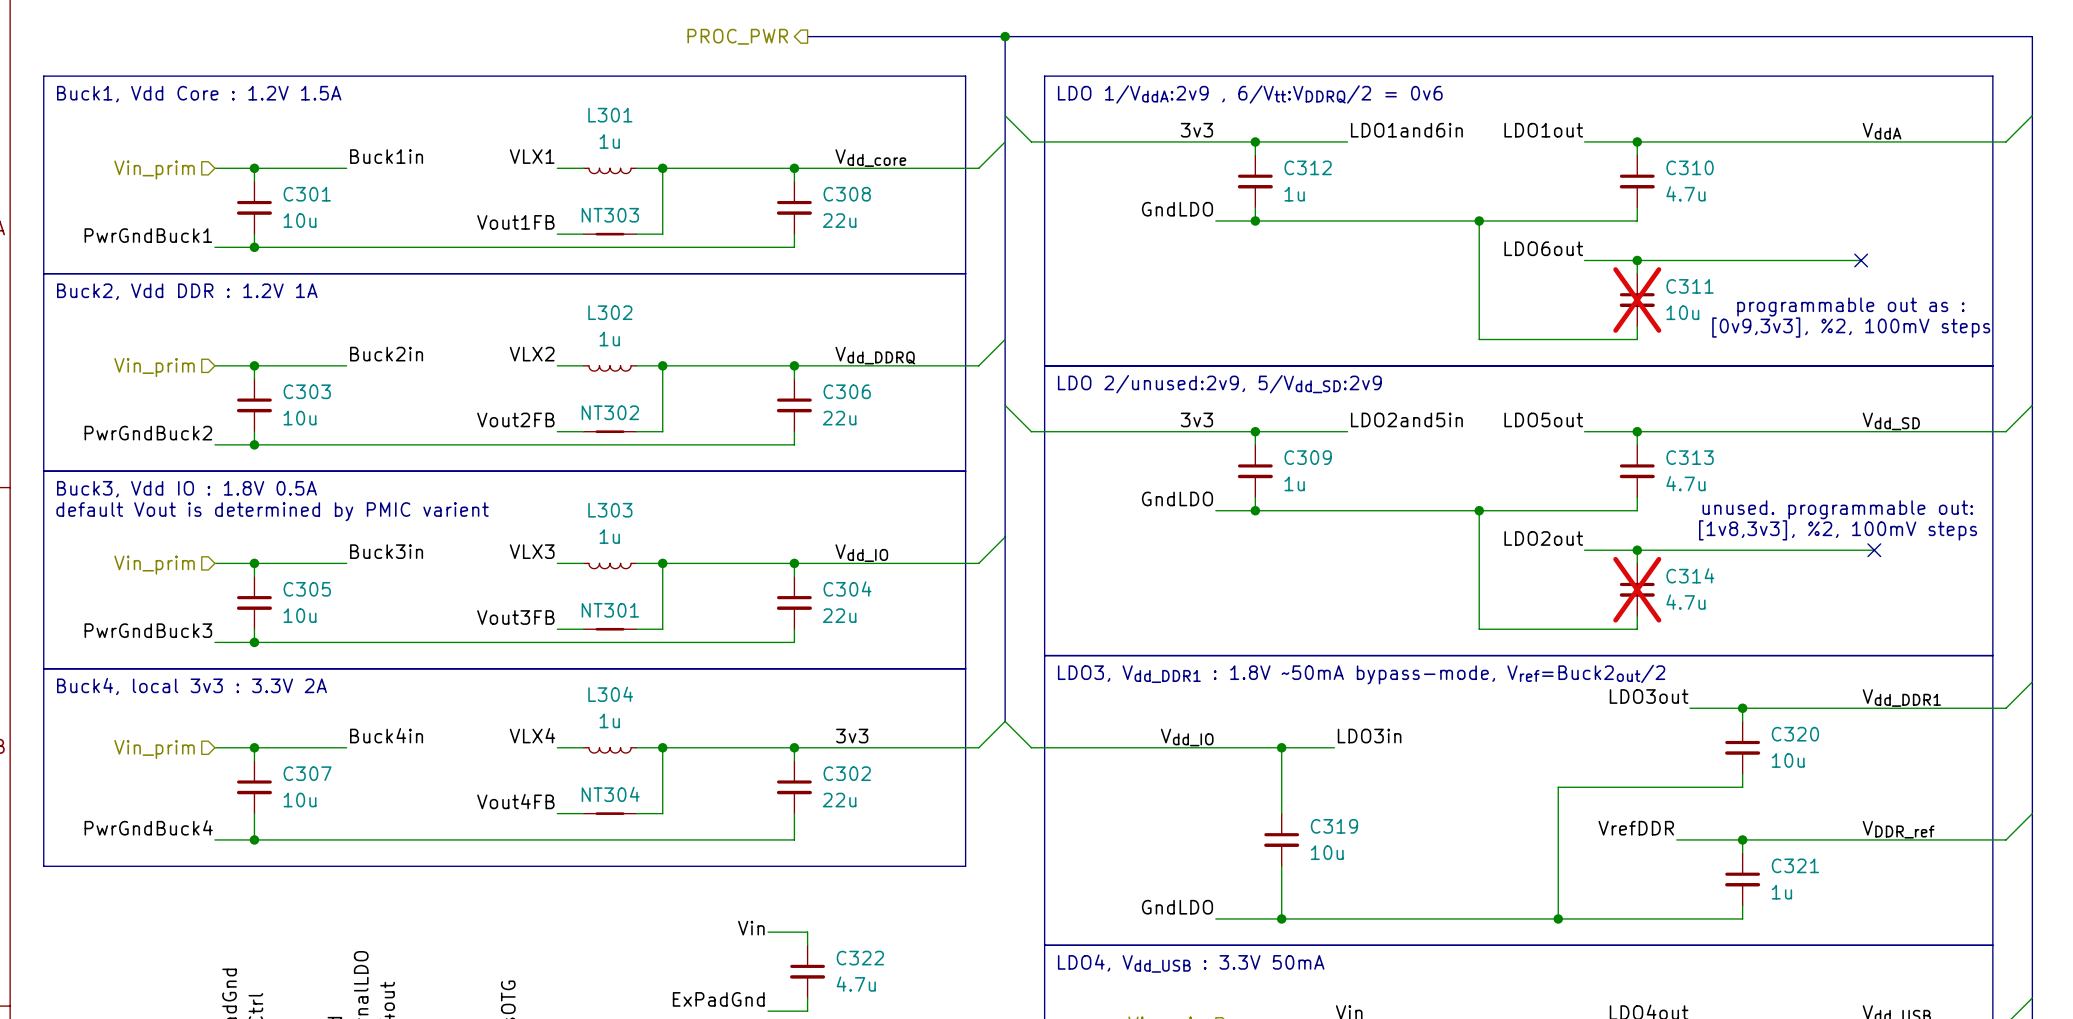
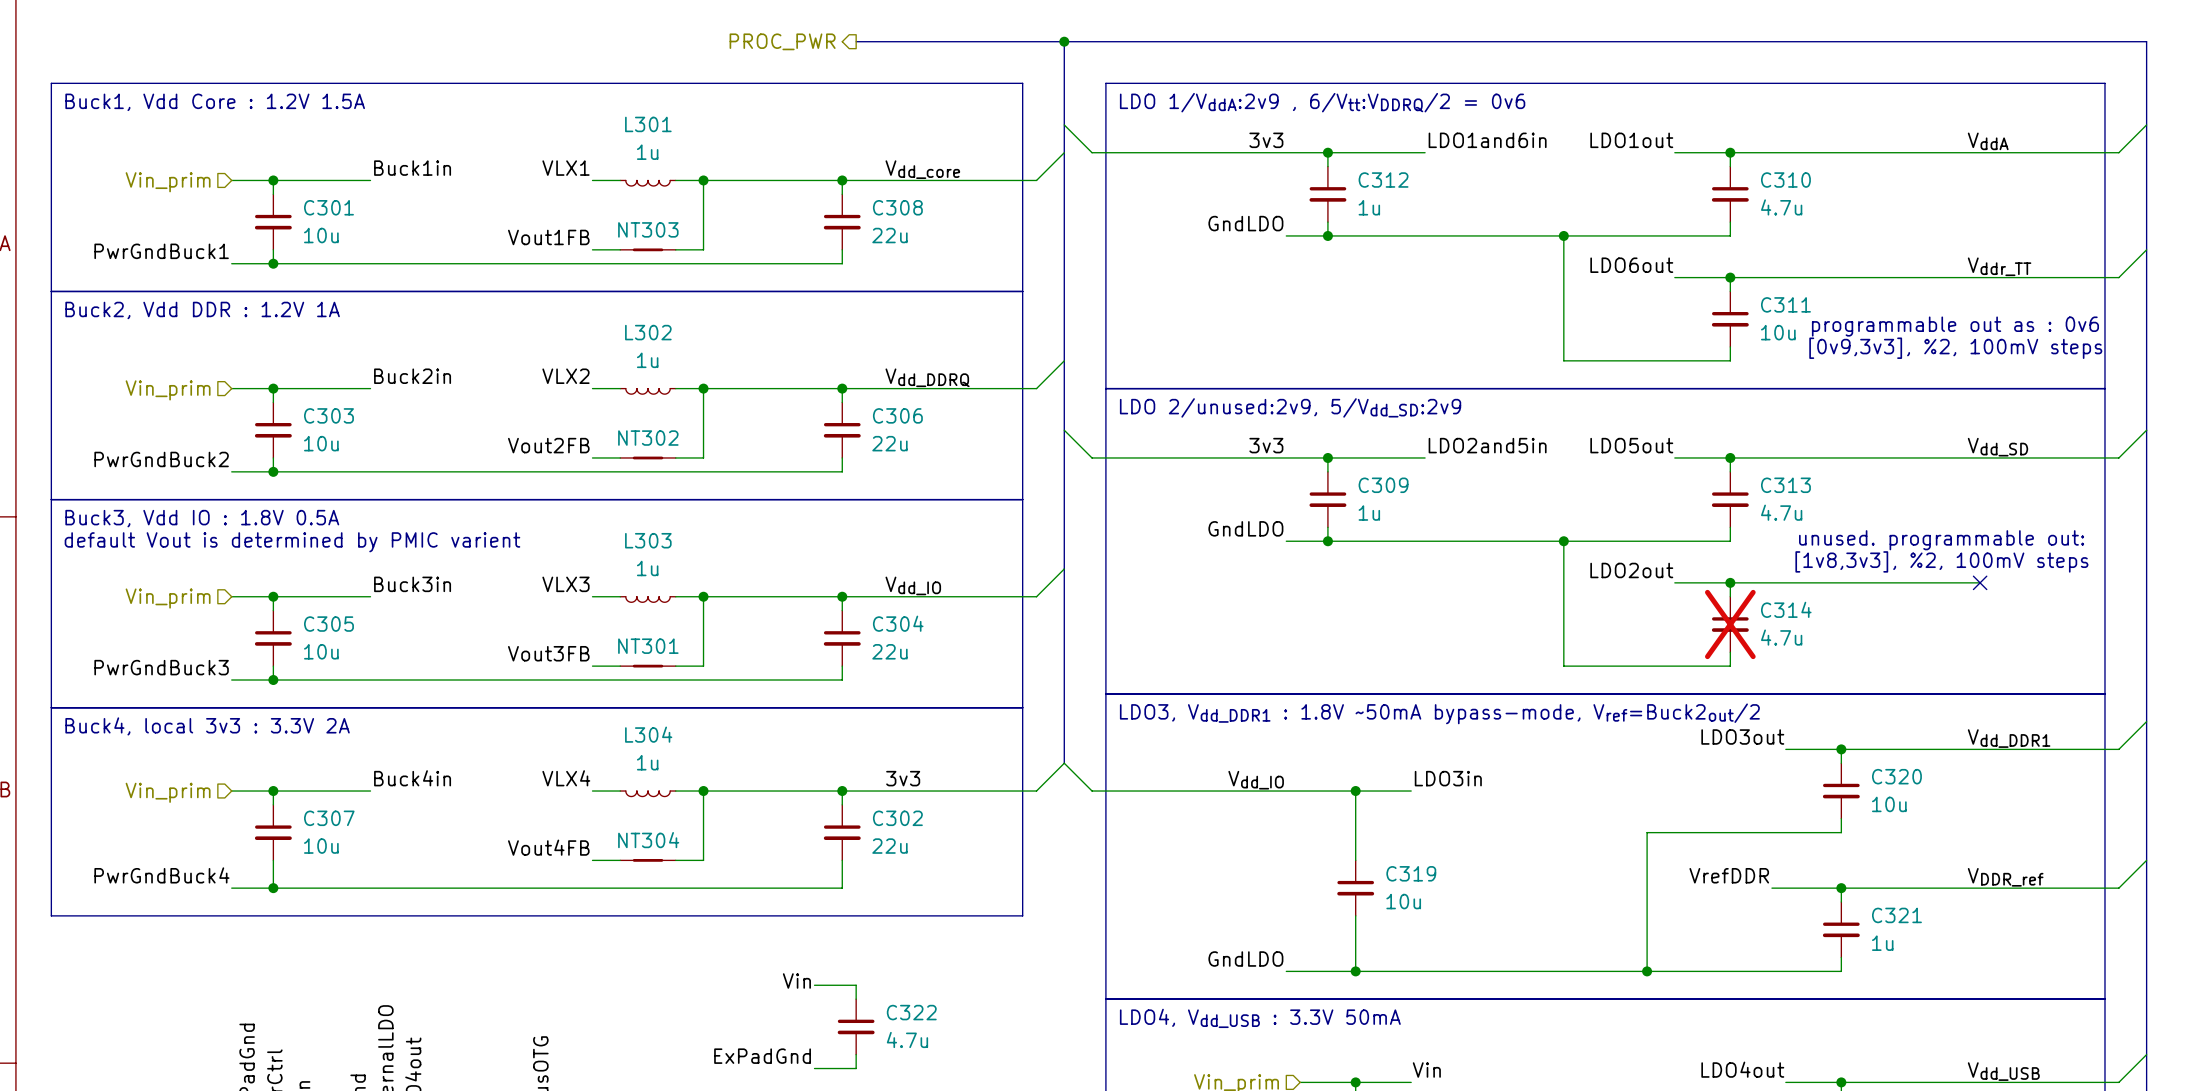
wire: none -> (2146, 249) (2118, 277) (1966, 277)
label: none -> Vddr_TT (1999, 266)
no-connect mark: (1861, 260) -> none
C311 do-not-place cross: (1637, 300) -> none
text: programmable out as : (1850, 306) -> programmable out as : 0v6 (1955, 326)

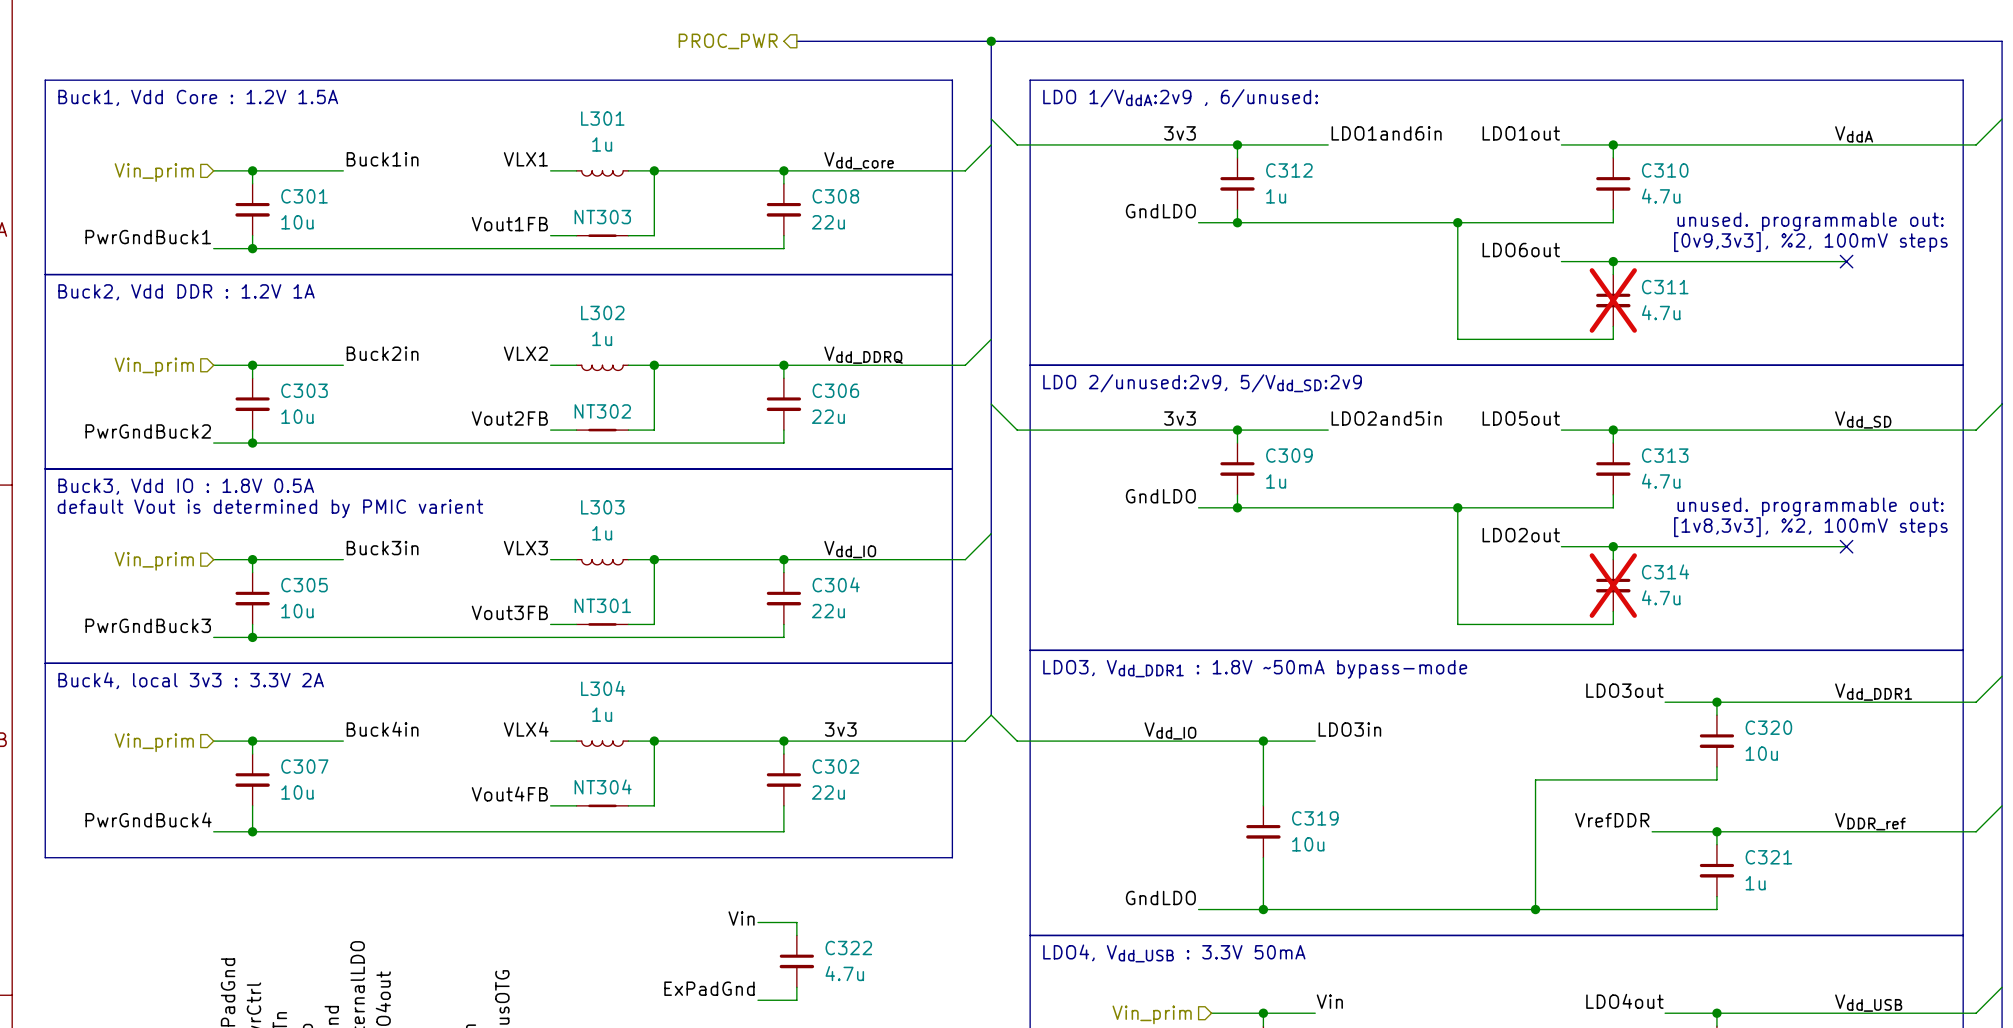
text: LDO 1/VddA:2v9 , 6/Vtt:VDDRQ/2 = 0v6 (1322, 102) -> LDO 1/VddA:2v9 , 6/unused: (1180, 98)
text: none -> unused. programmable out: (1810, 221)
wire: (2146, 249) (2118, 277) (1980, 277) -> none
label: Vddr_TT (1999, 266) -> none
no-connect mark: none -> (1846, 261)
C311 do-not-place cross: none -> (1613, 300)
text: programmable out as : 0v6 (1955, 326) -> none
C311 value: 10u (1778, 332) -> 4.7u (1661, 312)
text position: [0v9,3v3], %2, 100mV steps (1955, 348) -> [0v9,3v3], %2, 100mV steps (1810, 242)
text: LDO3, Vdd_DDR1 : 1.8V ~50mA bypass-mode, Vref=Buck2out/2 (1439, 713) -> LDO3, Vdd_DDR1 : 1.8V ~50mA bypass-mode (1255, 669)

